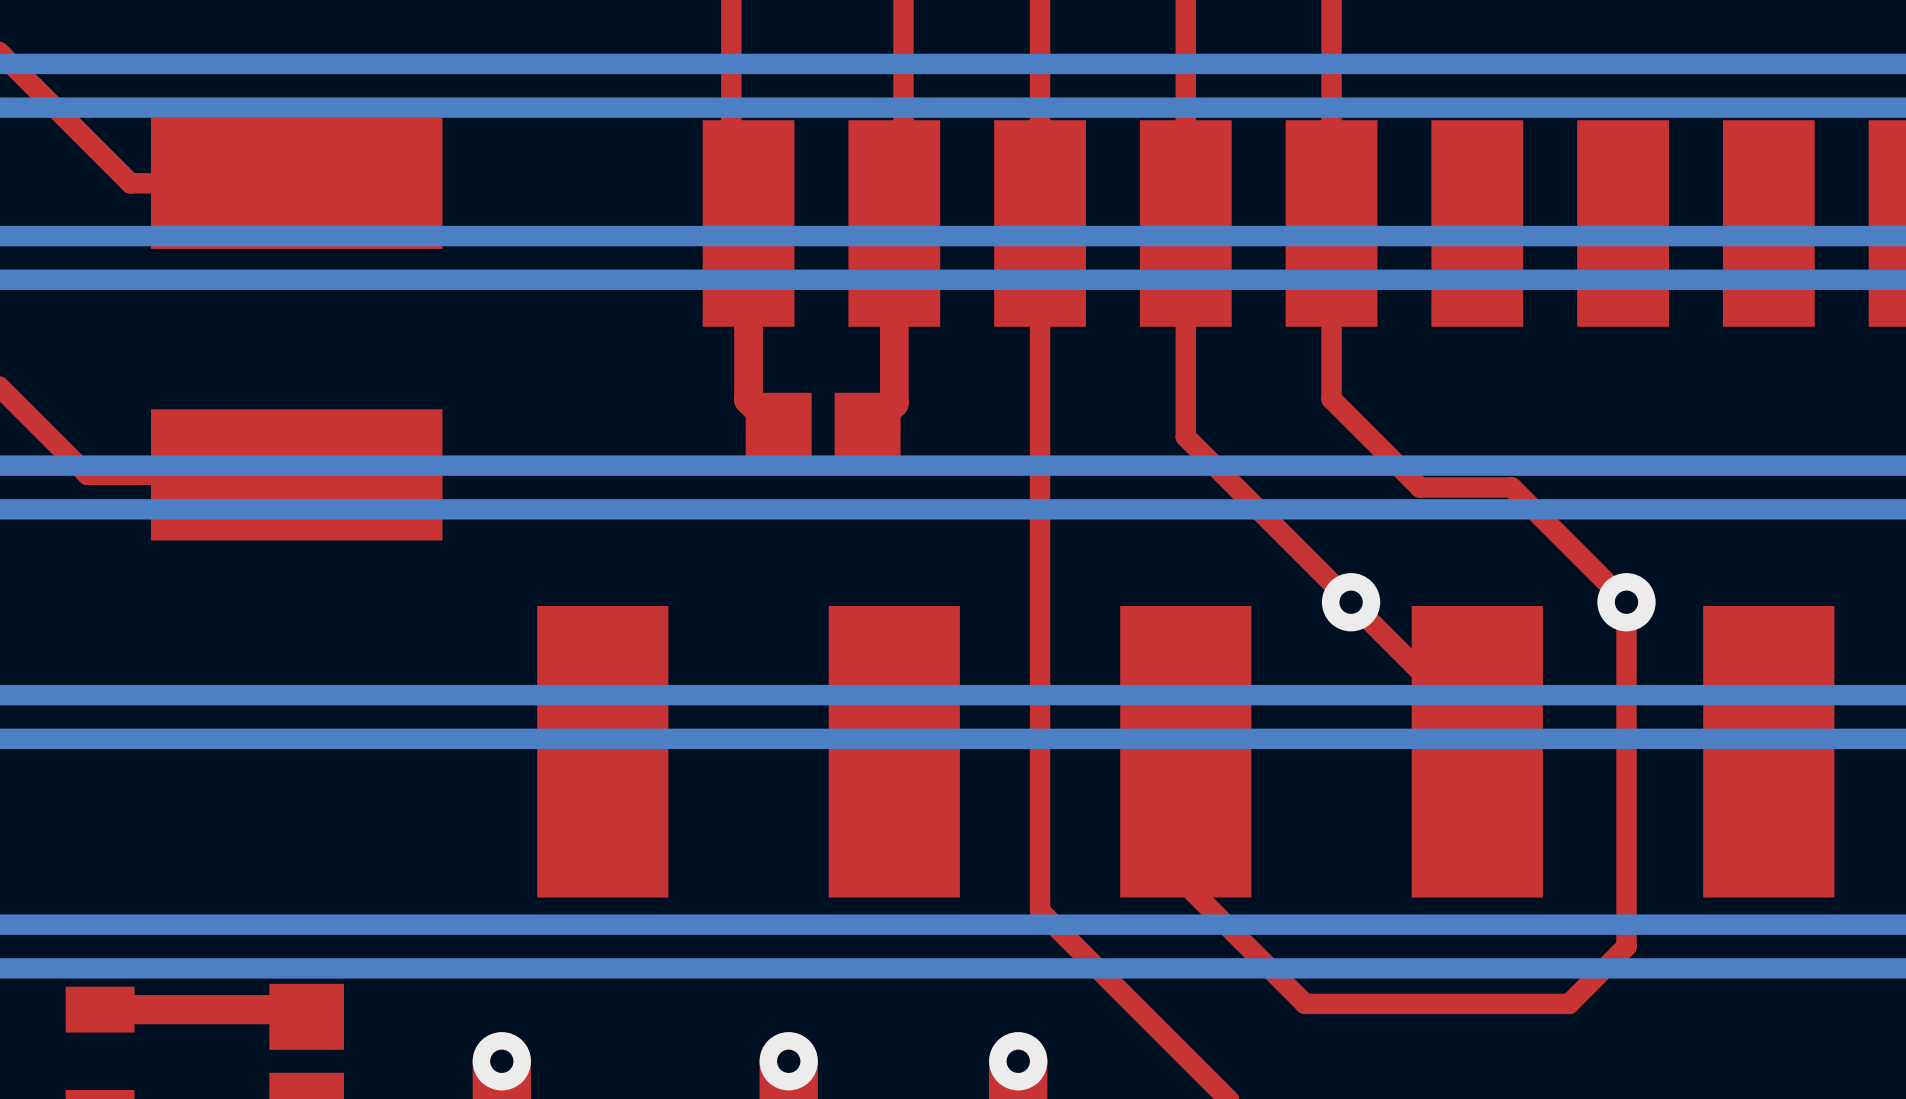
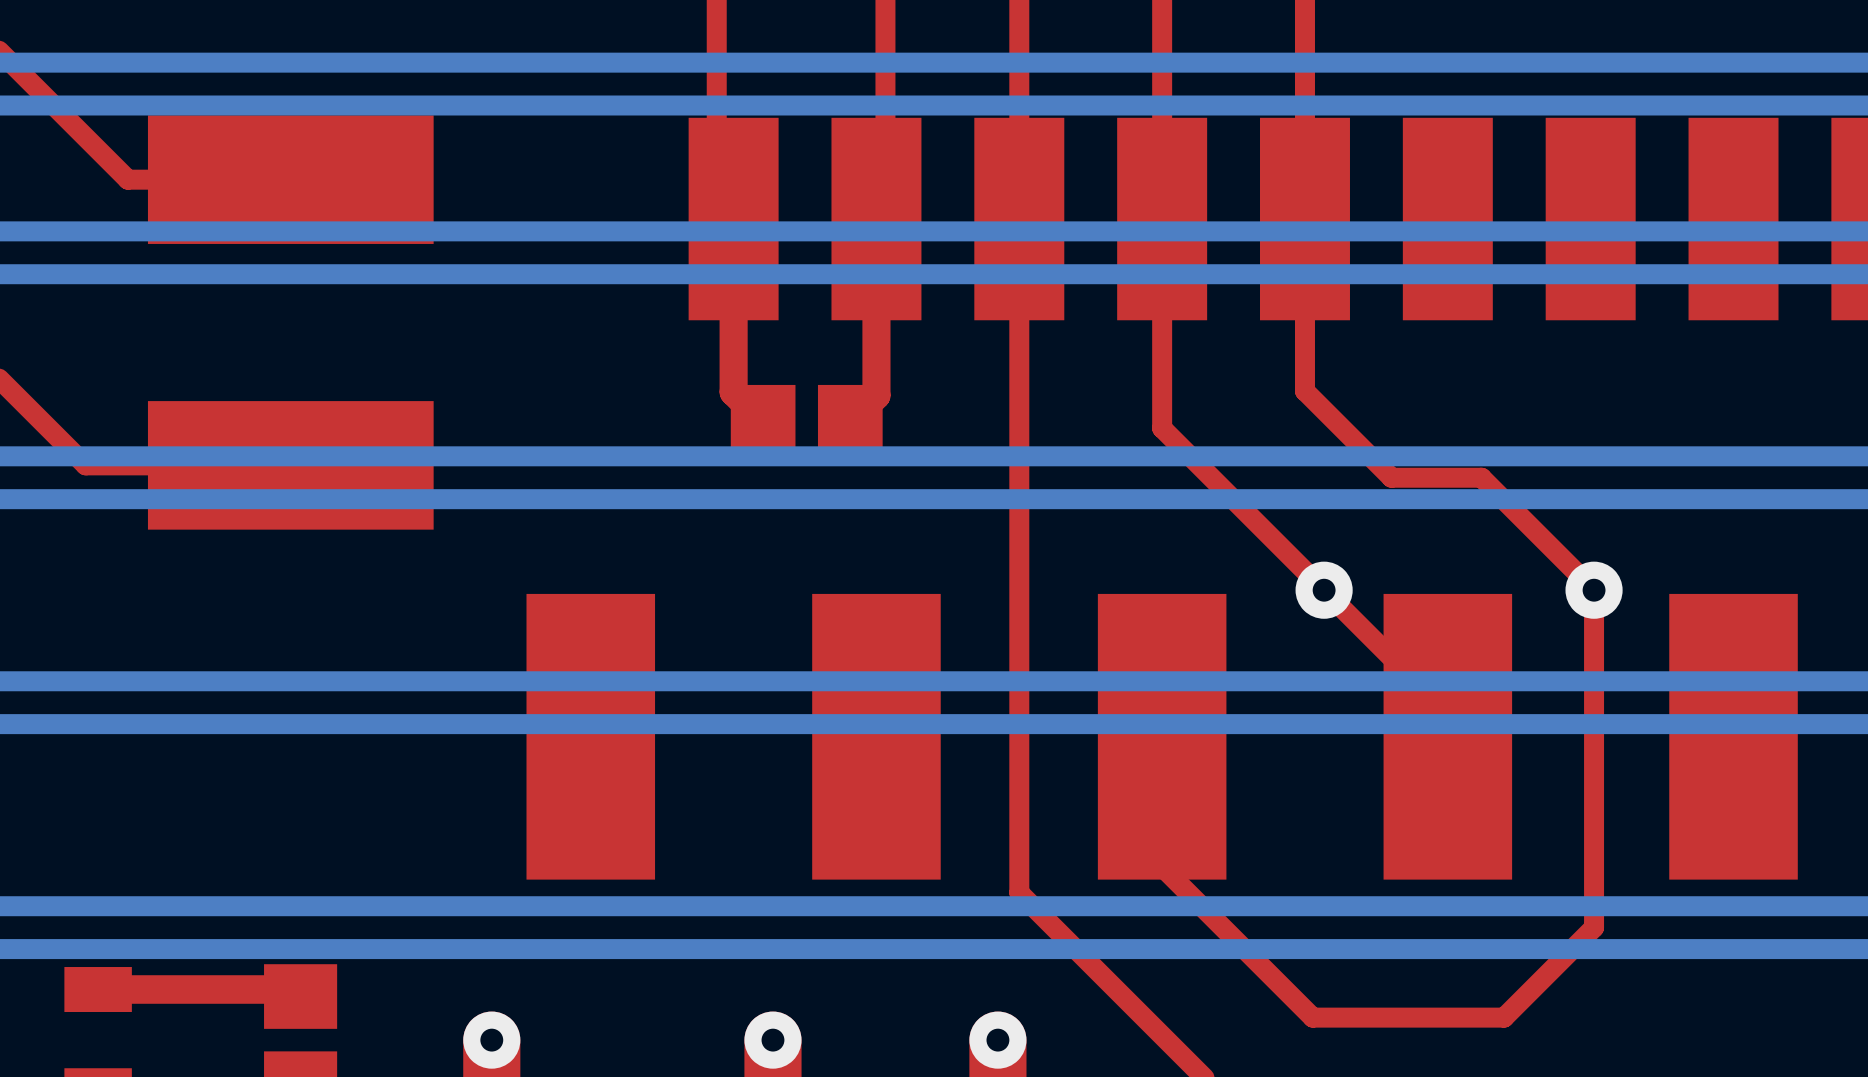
top track: (1569, 1003) (1305, 1003) -> (1537, 983) (1504, 1017) (1312, 1017) (1279, 983)

